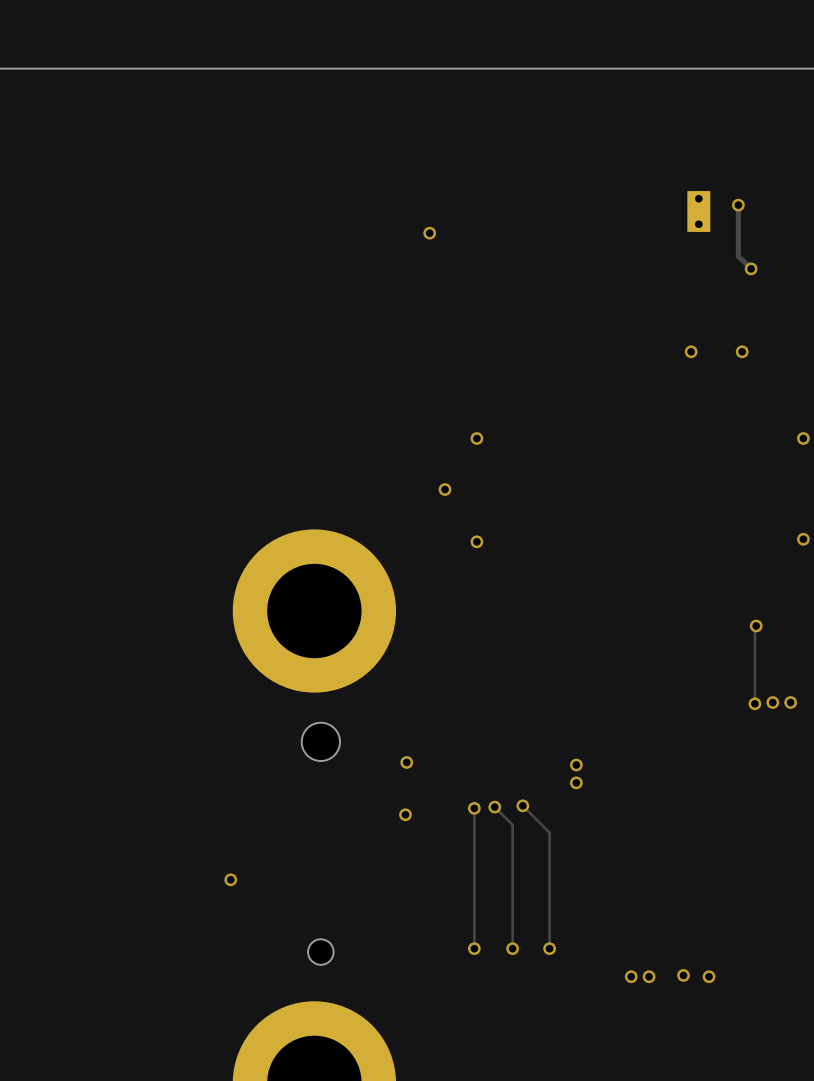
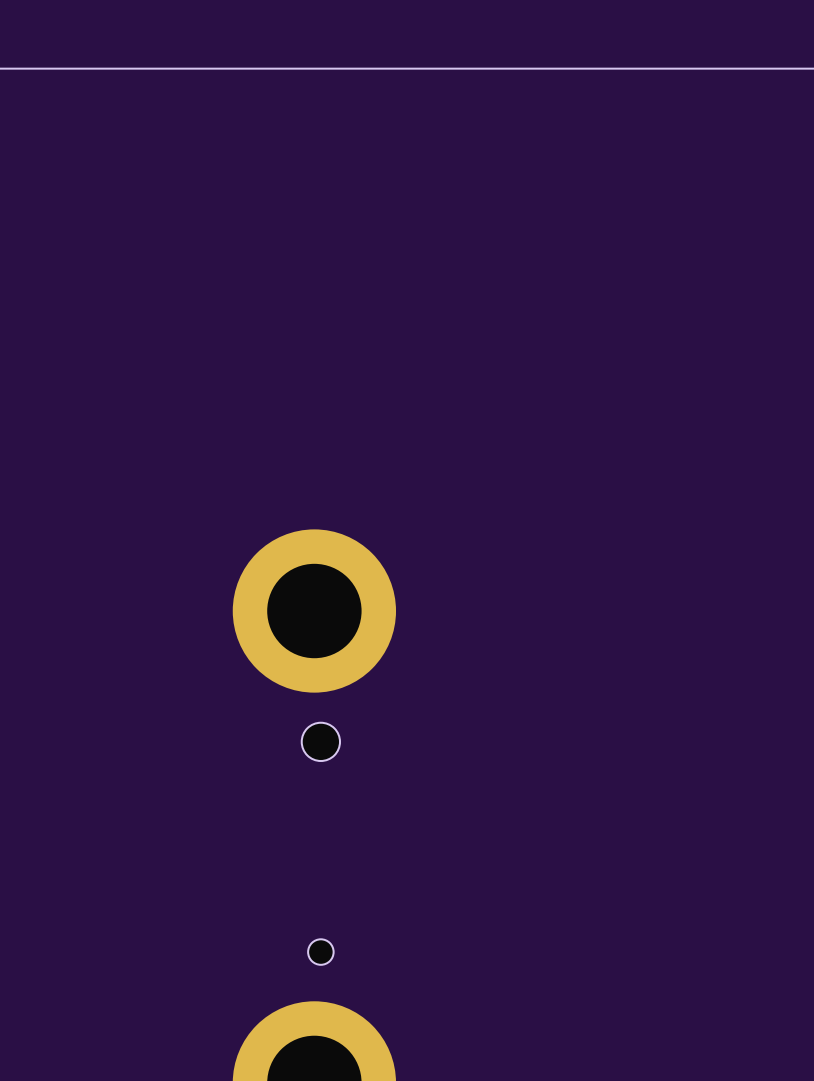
track: (738, 205) (738, 256) (751, 268) -> none
via: (738, 205) -> none
part: (698, 211) -> none
via: (429, 233) -> none
via: (751, 268) -> none
via: (691, 351) -> none
via: (742, 351) -> none
via: (476, 438) -> none
via: (803, 438) -> none
via: (445, 489) -> none
via: (803, 539) -> none
via: (476, 541) -> none
track: (756, 625) (754, 703) -> none
via: (756, 625) -> none
via: (772, 702) -> none
via: (790, 702) -> none
via: (754, 703) -> none
via: (406, 762) -> none
via: (576, 765) -> none
via: (576, 782) -> none
track: (522, 805) (549, 832) (549, 948) -> none
via: (522, 805) -> none
track: (494, 807) (512, 824) (512, 948) -> none
via: (494, 807) -> none
track: (474, 808) (474, 948) -> none
via: (474, 808) -> none
via: (405, 814) -> none
via: (230, 879) -> none
via: (474, 948) -> none
via: (512, 948) -> none
via: (549, 948) -> none
via: (683, 975) -> none
via: (631, 976) -> none
via: (649, 976) -> none
via: (709, 976) -> none

